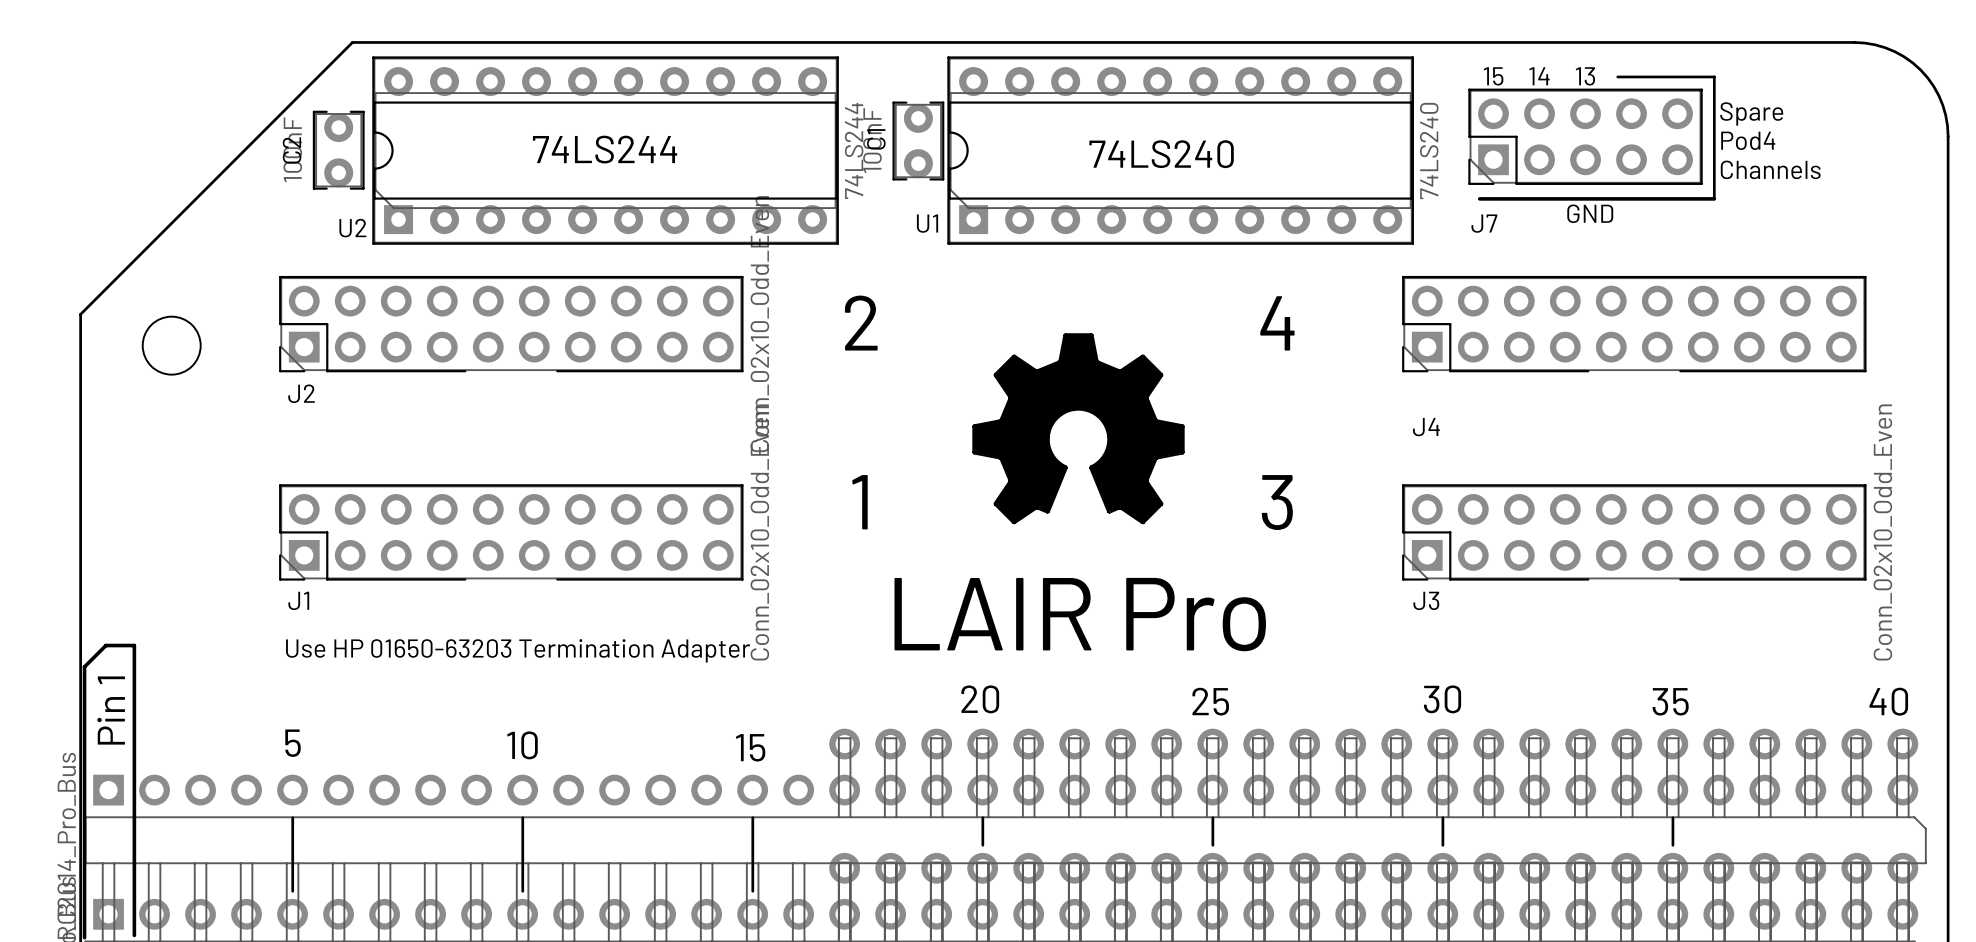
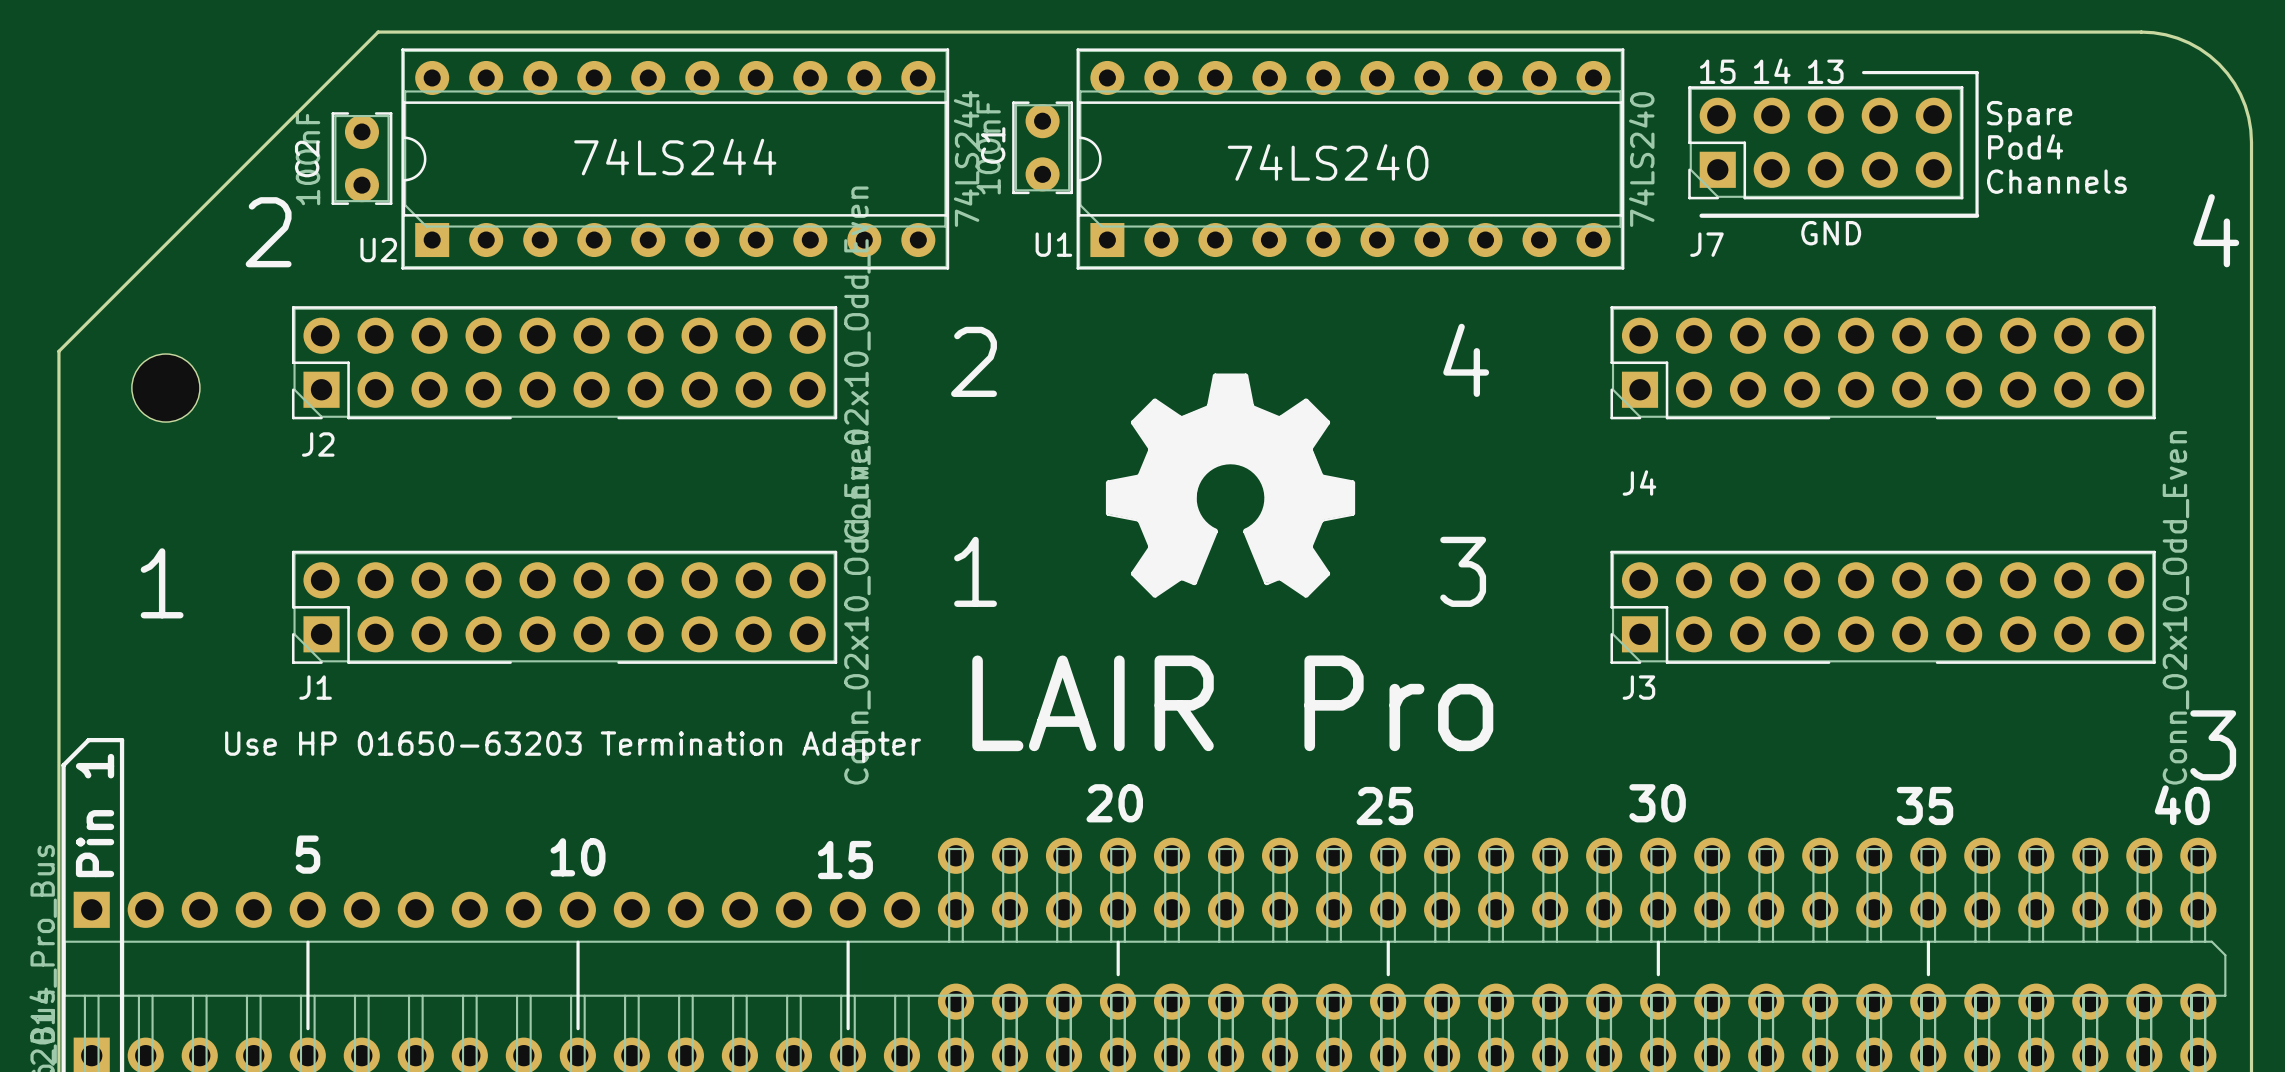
text: none -> 2 (268, 232)
text: none -> 4 (2216, 230)
text: none -> 1 (162, 583)
text: none -> 3 (2213, 745)

